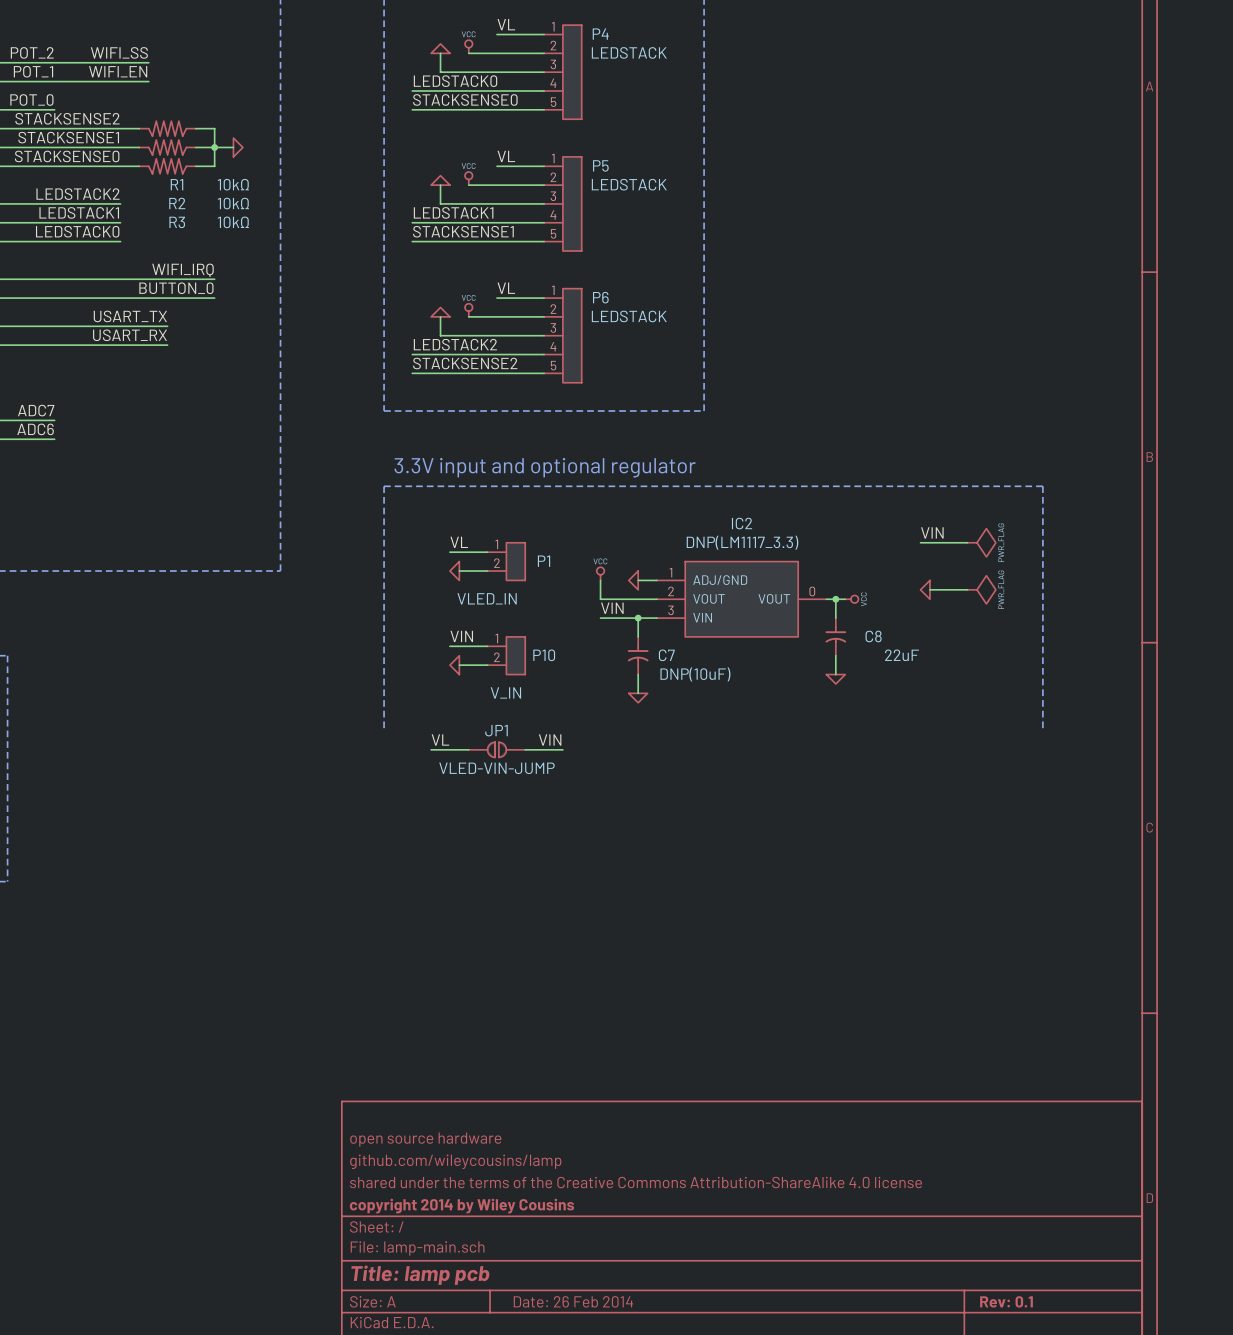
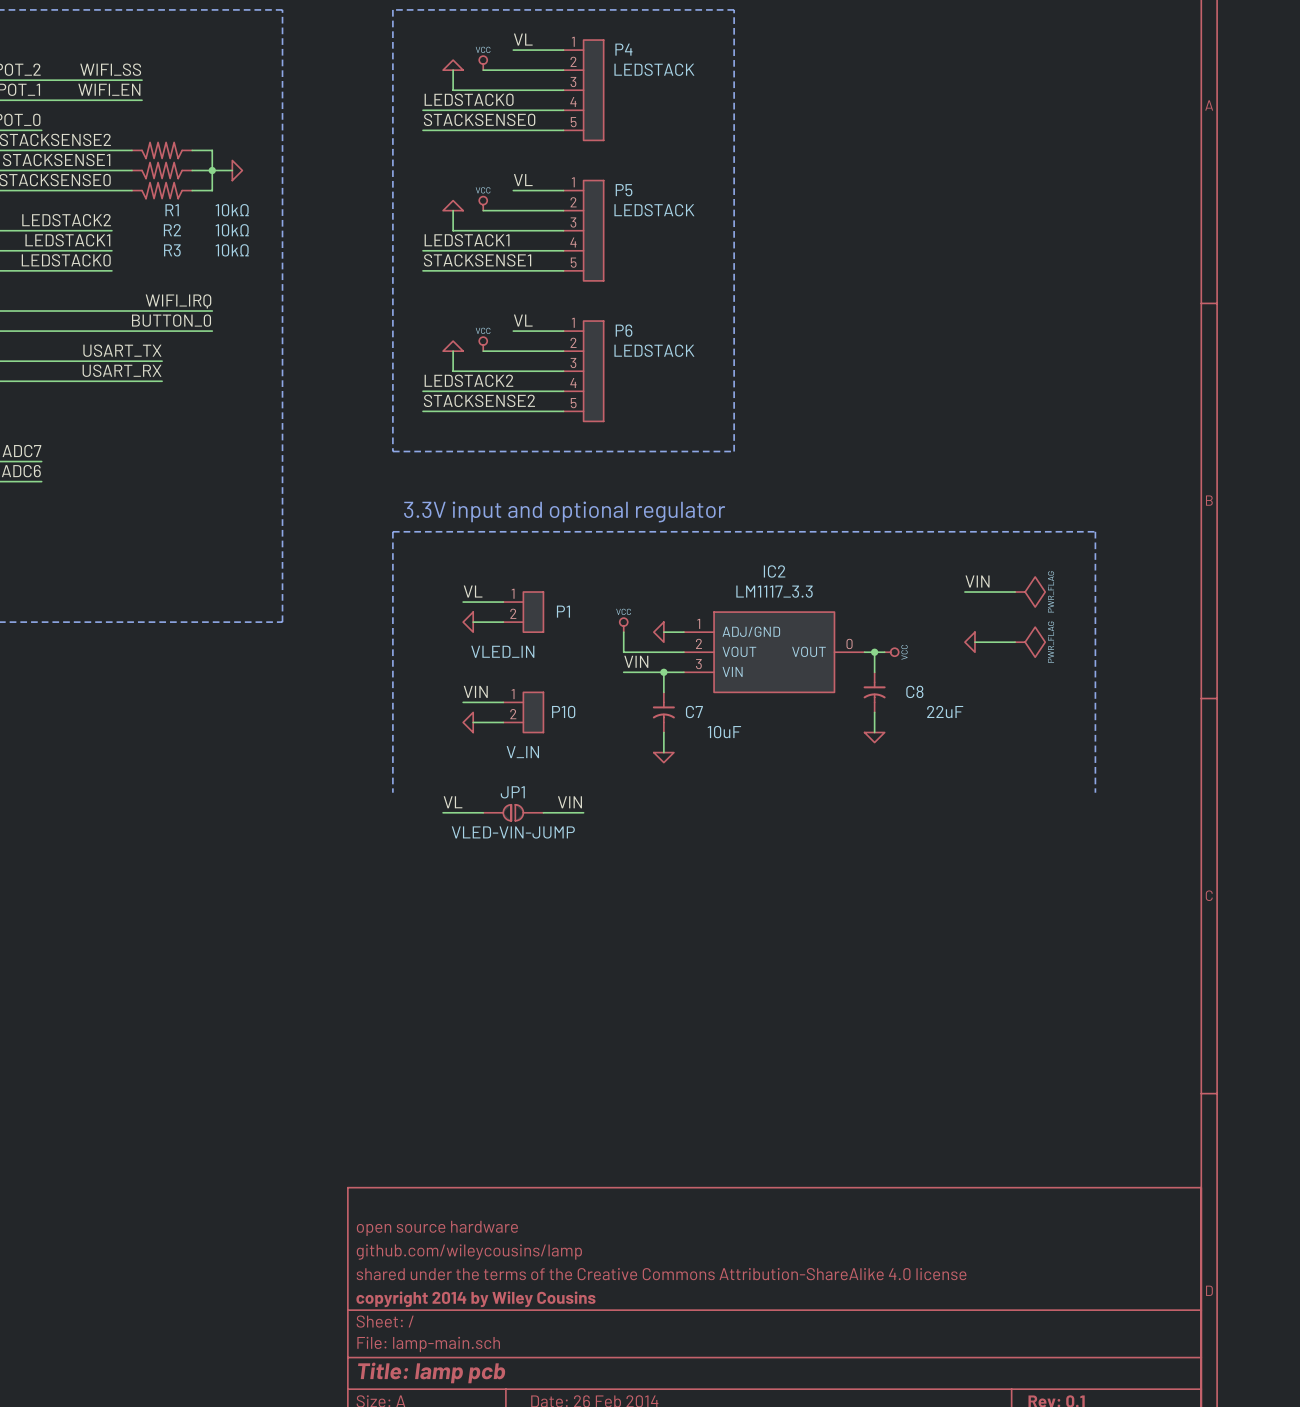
IC2 value: DNP(LM1117_3.3) (742, 542) -> LM1117_3.3 (774, 591)
C7 value: DNP(10uF) (695, 674) -> 10uF (724, 732)

